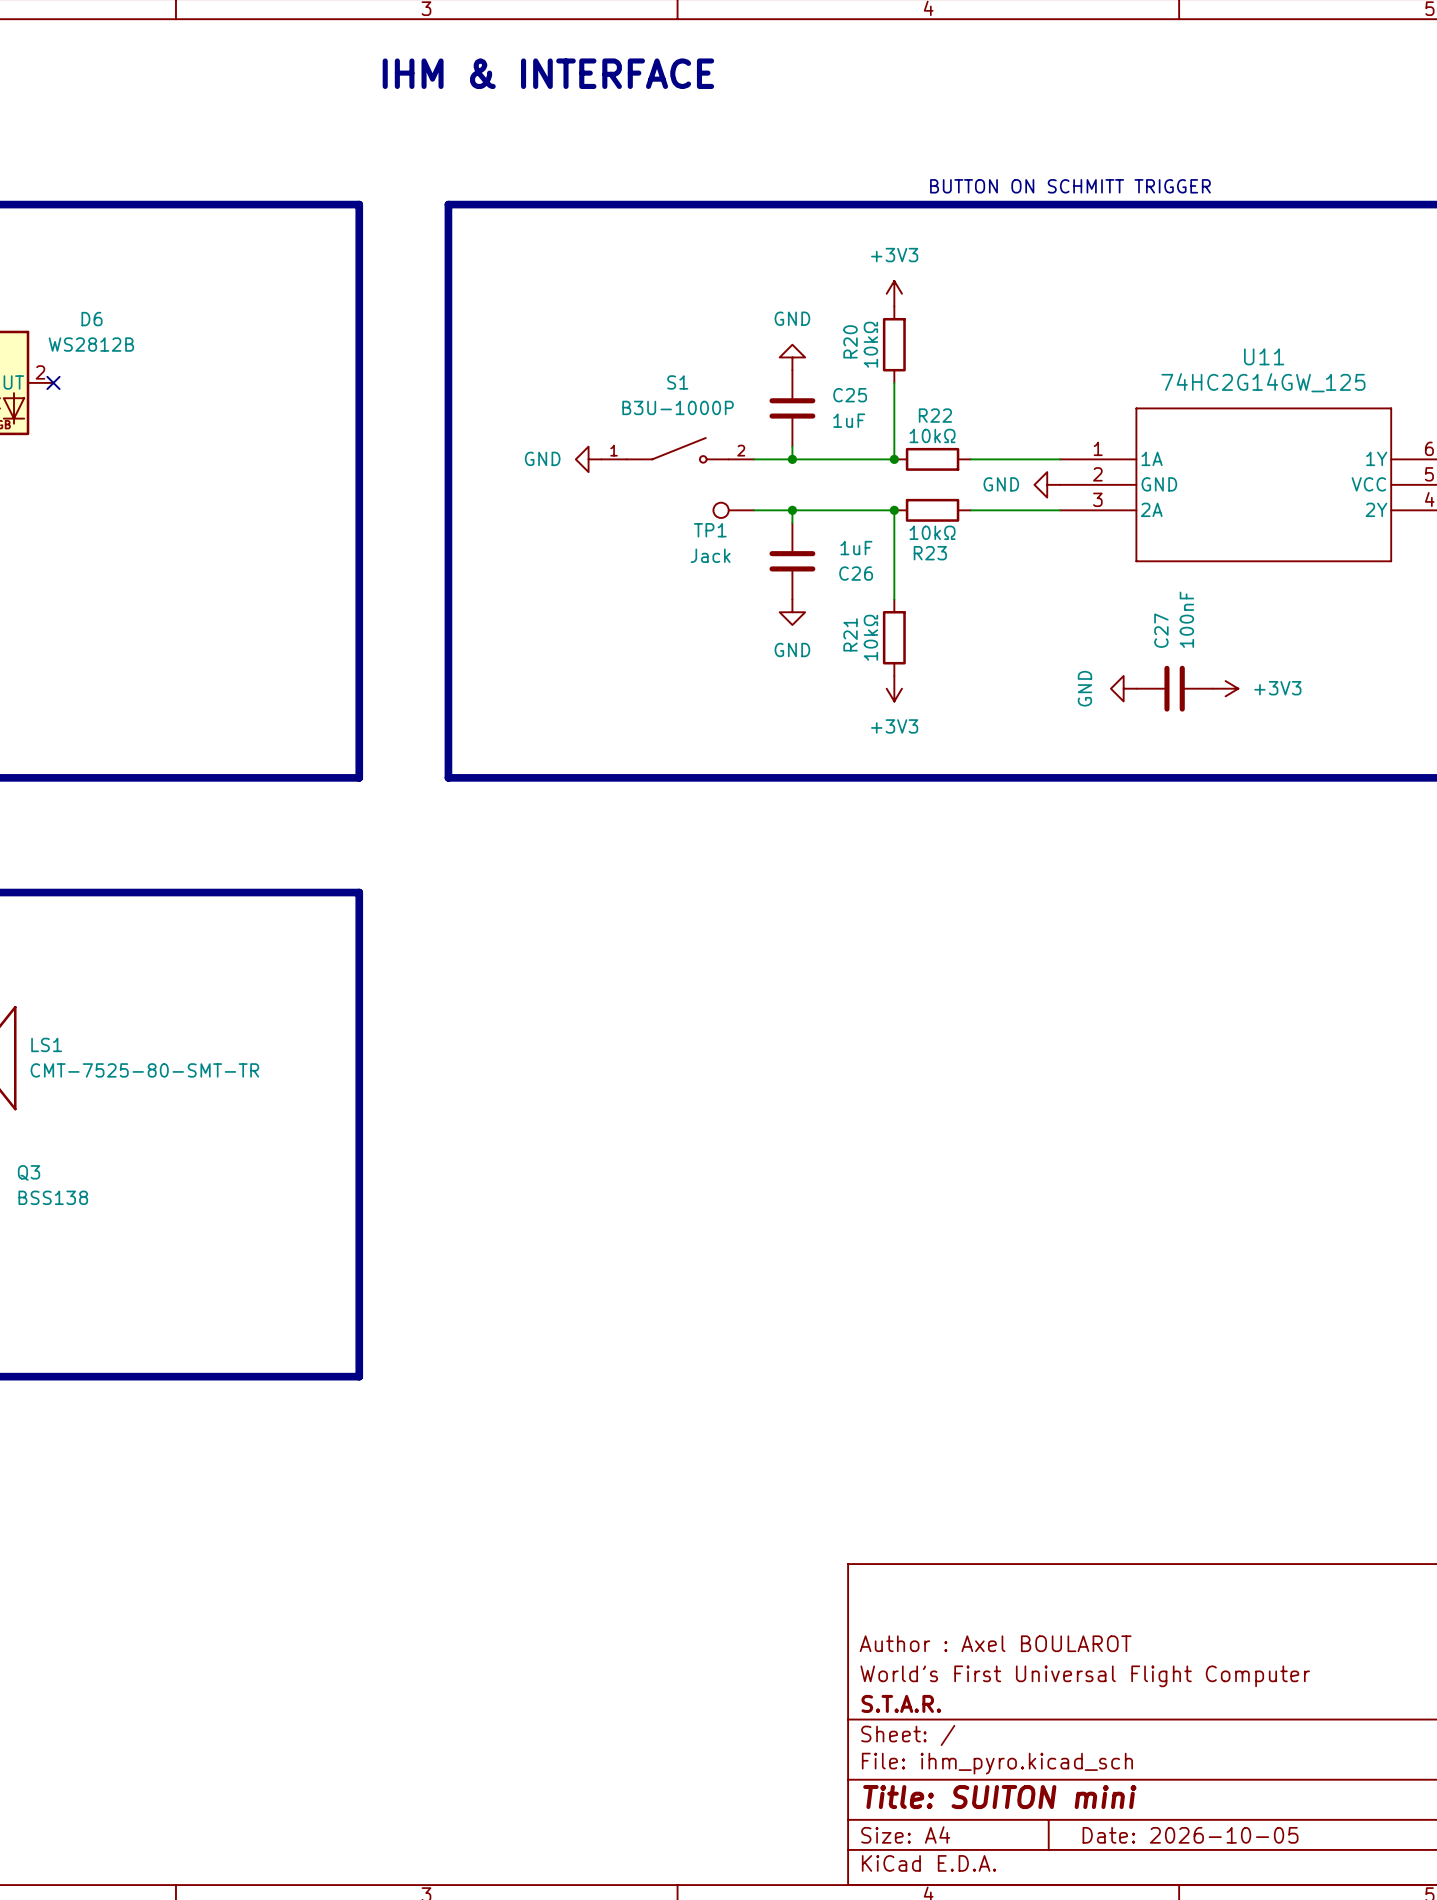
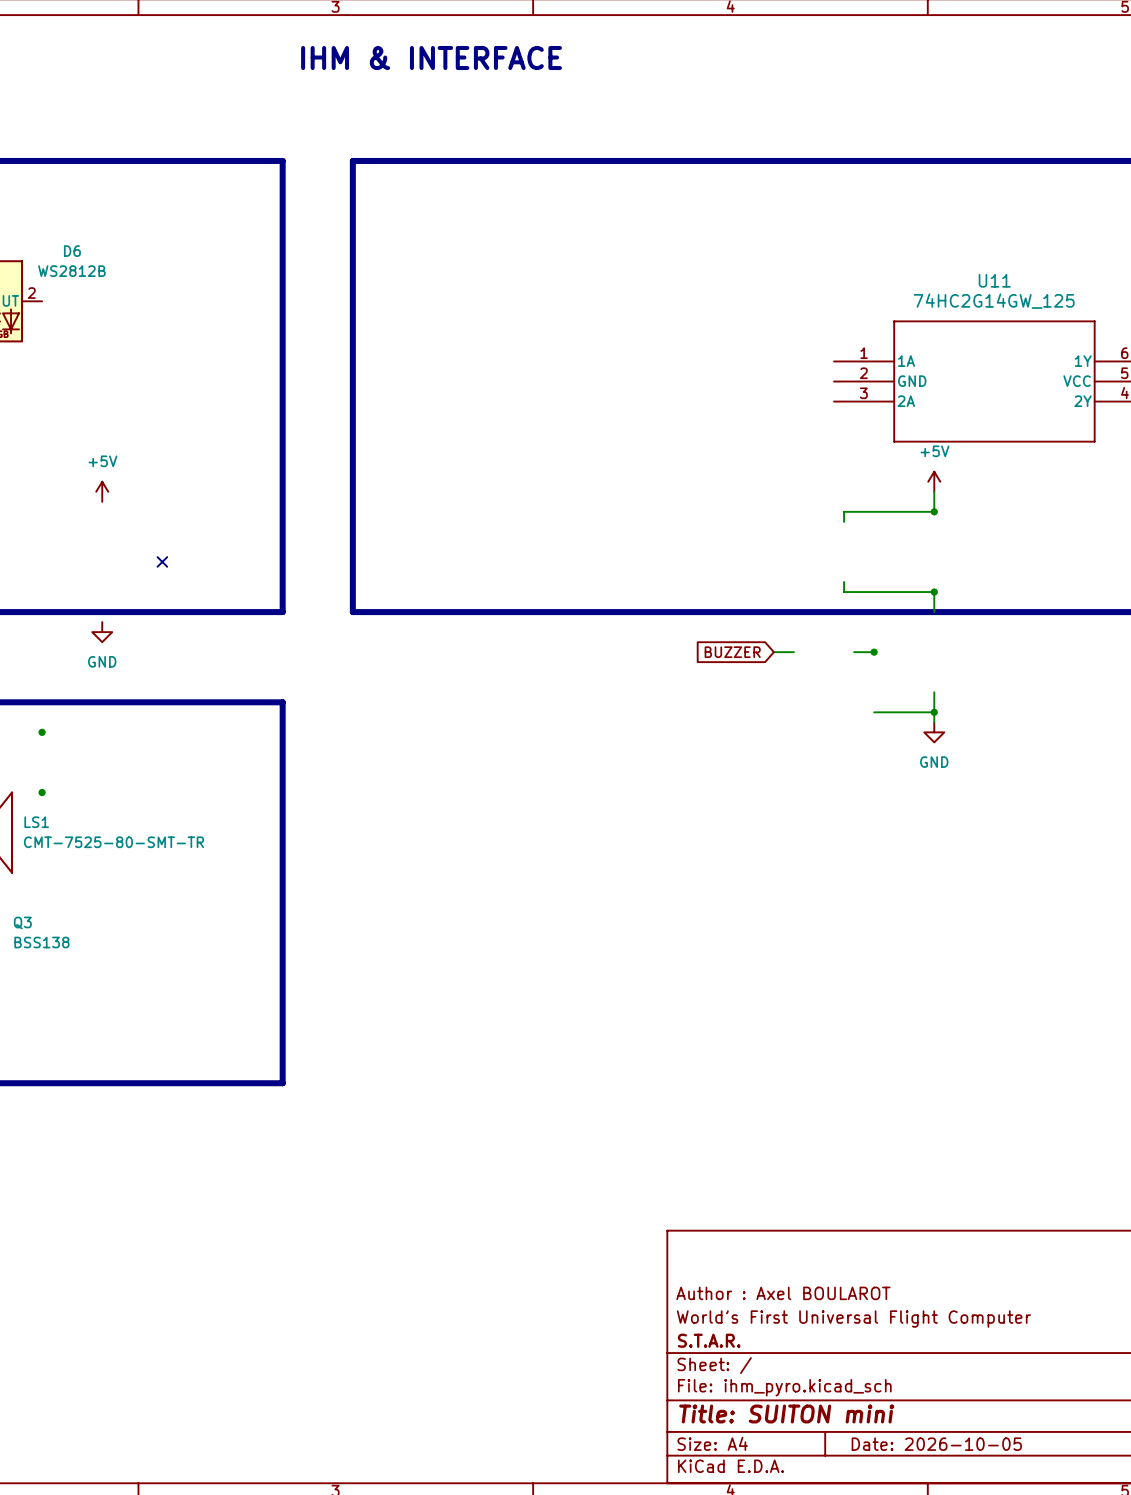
text: BUTTON ON SCHMITT TRIGGER (1070, 186) -> none
power symbol: +3V3 (894, 293) -> none
R20: 10kΩ (894, 344) -> none
power symbol: GND (792, 357) -> none
no-connect mark: (53, 382) -> none
wire: (894, 382) (894, 459) (754, 459) -> none
C25: 1uF (792, 408) -> none
wire: (792, 446) (792, 459) -> none
S1: B3U-1000P (677, 450) -> none
power symbol: GND (588, 459) -> none
junction: (792, 459) -> none
junction: (894, 459) -> none
R22: 10kΩ (932, 459) -> none
wire: (970, 459) (1059, 459) -> none
power symbol: GND (1047, 484) -> none
TP1: Jack (733, 510) -> none
wire: (754, 510) (894, 510) (894, 599) -> none
wire: (792, 510) (792, 523) -> none
junction: (792, 510) -> none
junction: (894, 510) -> none
R23: 10kΩ (932, 510) -> none
wire: (970, 510) (1059, 510) -> none
C26: 1uF (792, 561) -> none
power symbol: GND (792, 612) -> none
power symbol: none -> +5V (934, 481)
power symbol: none -> +5V (102, 491)
wire: none -> (934, 491) (934, 511) (844, 511) (844, 521)
R21: 10kΩ (894, 637) -> none
junction: none -> (934, 511)
power symbol: +3V3 (894, 688) -> none
power symbol: GND (1123, 688) -> none
C27: 100nF (1174, 688) -> none
power symbol: +3V3 (1225, 688) -> none
no-connect mark: none -> (162, 561)
wire: none -> (844, 582) (844, 592) (934, 592) (934, 612)
junction: none -> (934, 592)
power symbol: none -> GND (102, 632)
global label: none -> BUZZER (732, 652)
wire: none -> (773, 652) (793, 652)
wire: none -> (854, 652) (874, 652)
junction: none -> (874, 652)
wire: none -> (934, 692) (934, 722)
wire: none -> (874, 712) (934, 712)
junction: none -> (934, 712)
junction: none -> (42, 732)
power symbol: none -> GND (934, 732)
junction: none -> (42, 792)

